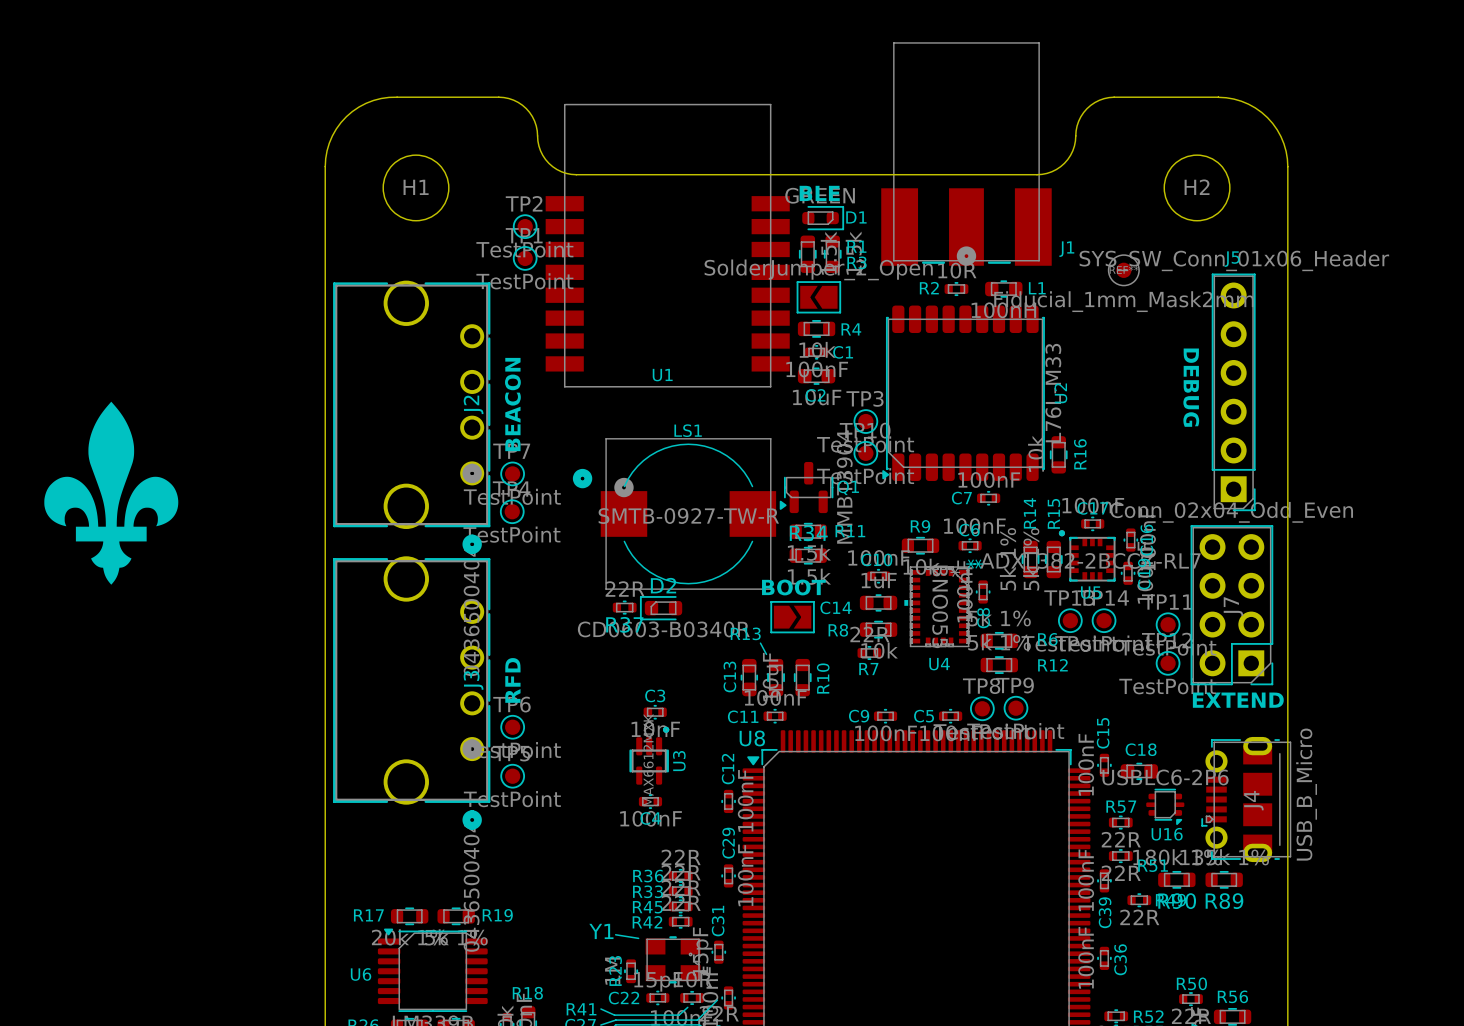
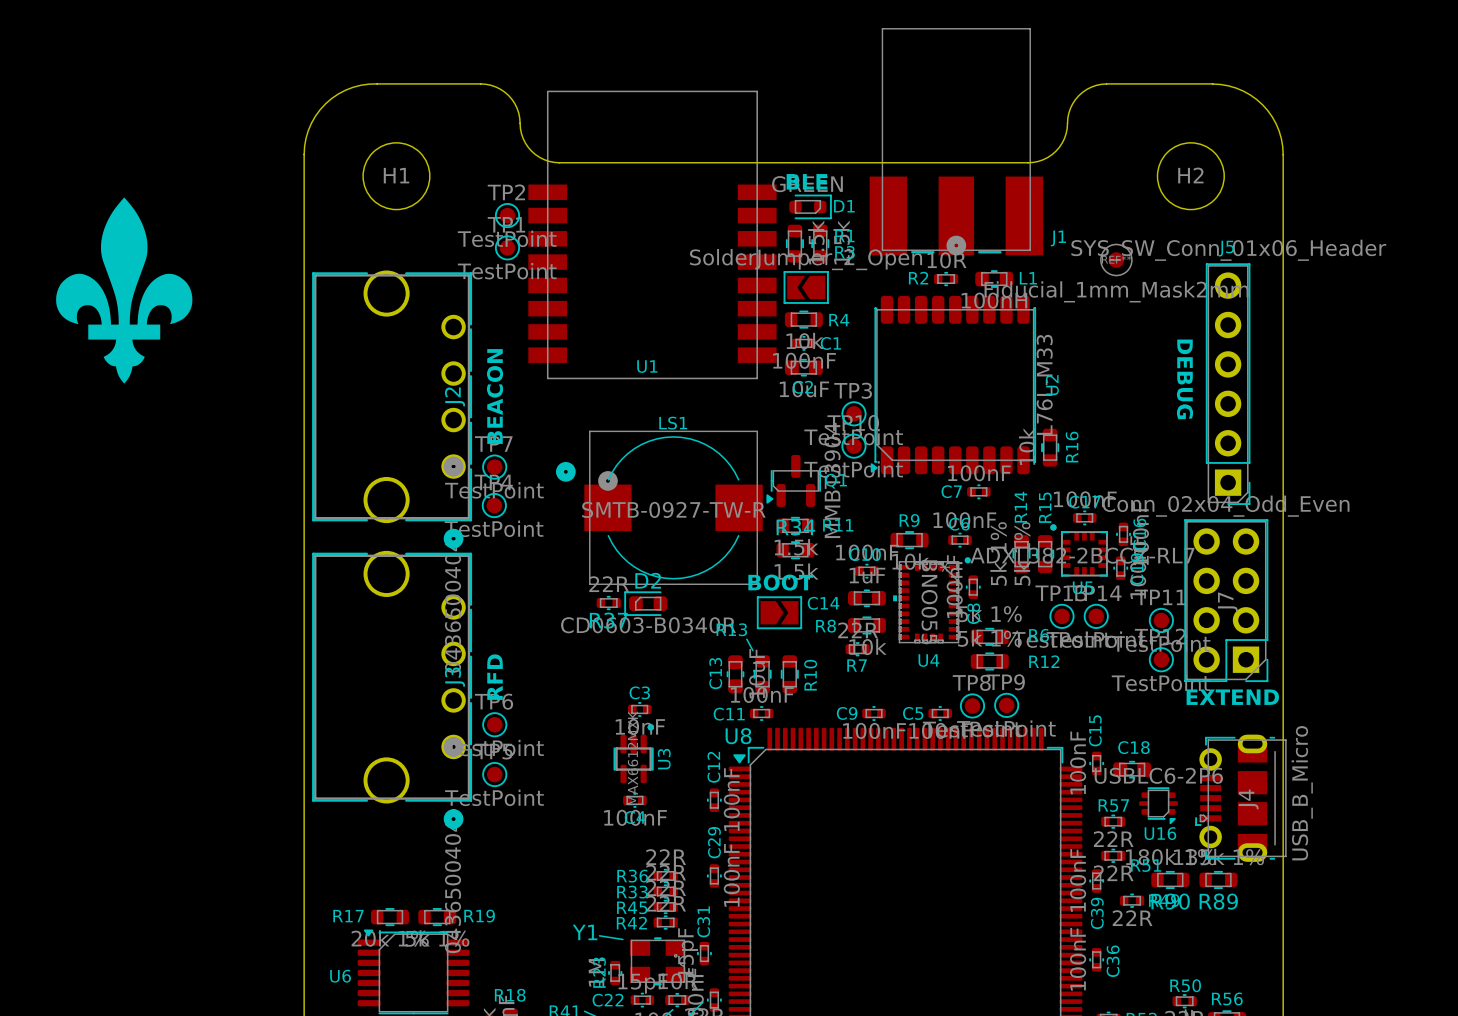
drawing position: (111, 493) -> (124, 290)
U4 footprint: [904, 566, 969, 647] -> [893, 557, 971, 643]

